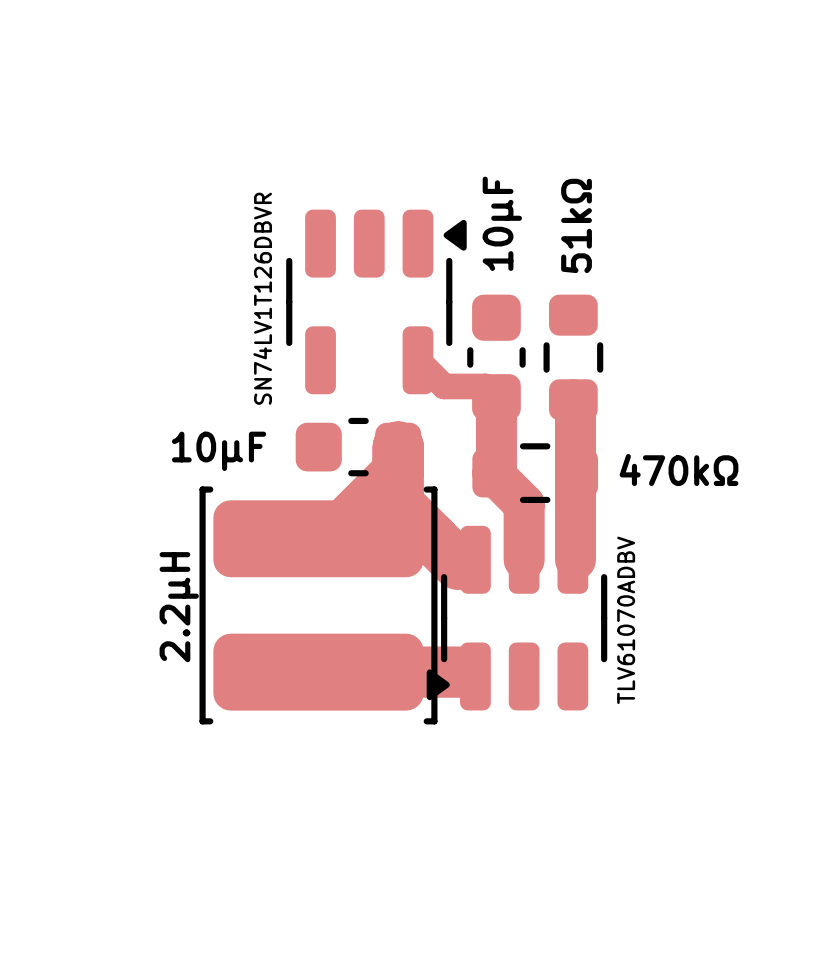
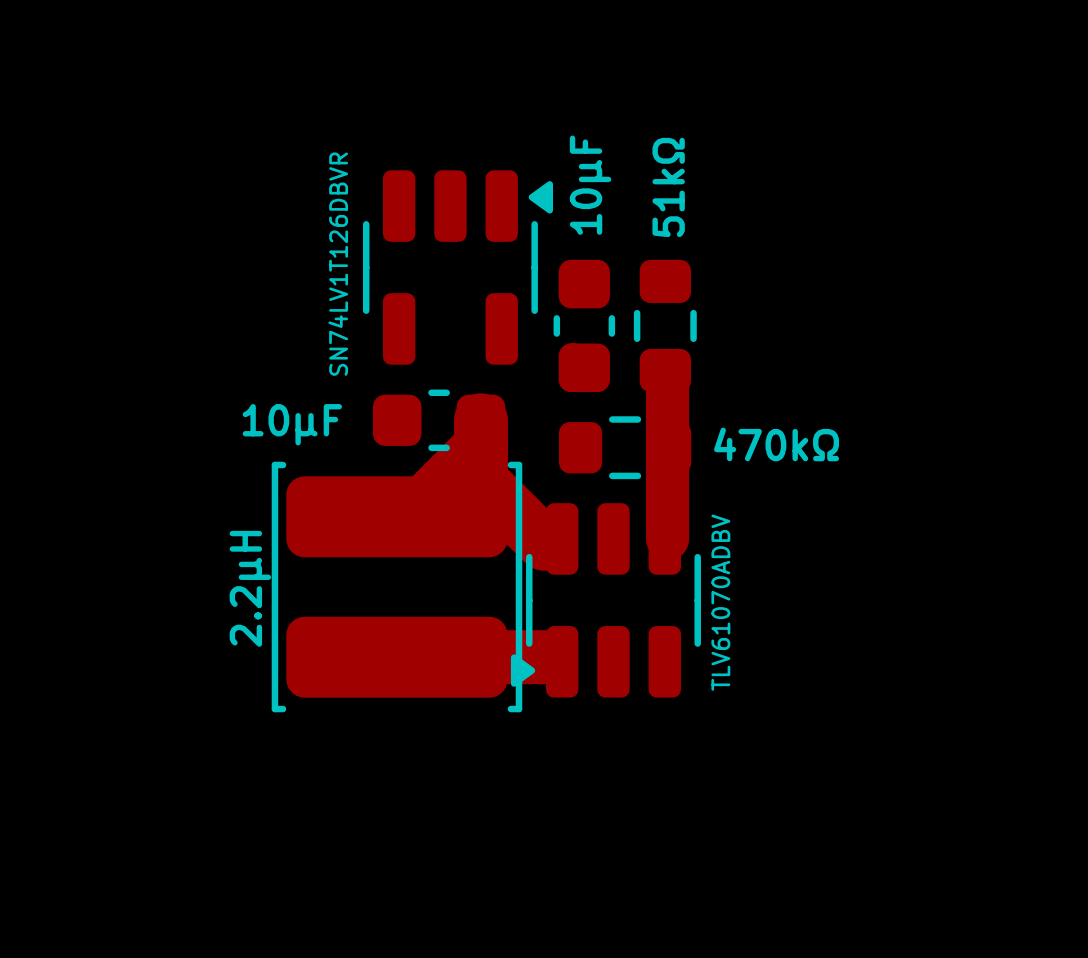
track: (417, 360) (444, 386) (485, 386) -> none
track: (496, 397) (496, 469) (492, 473) (524, 504) (524, 559) -> none

